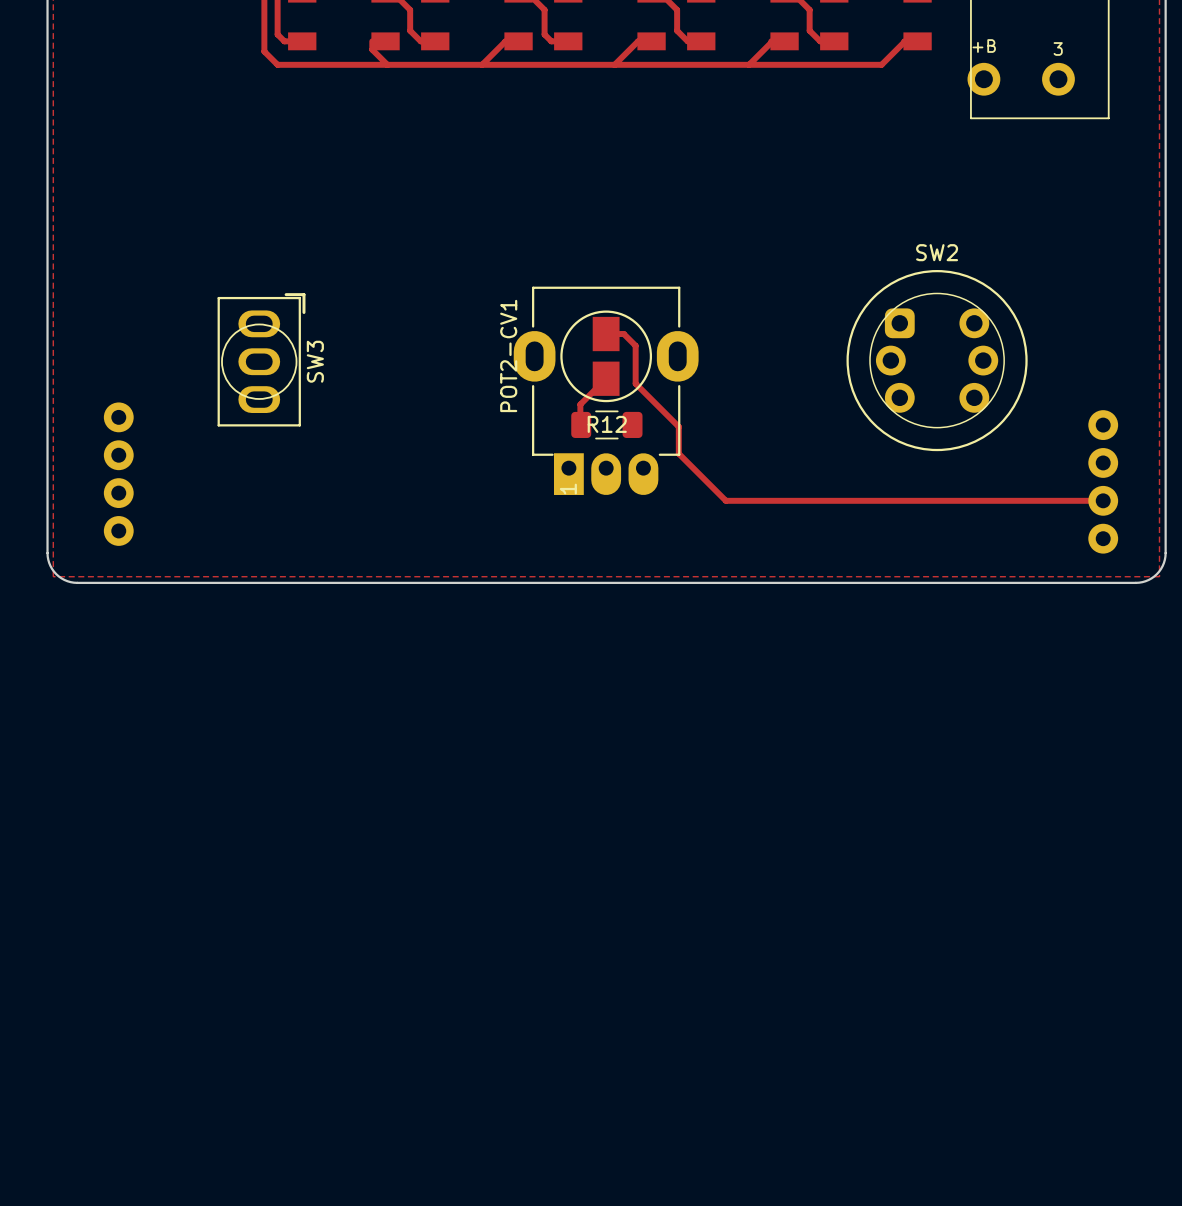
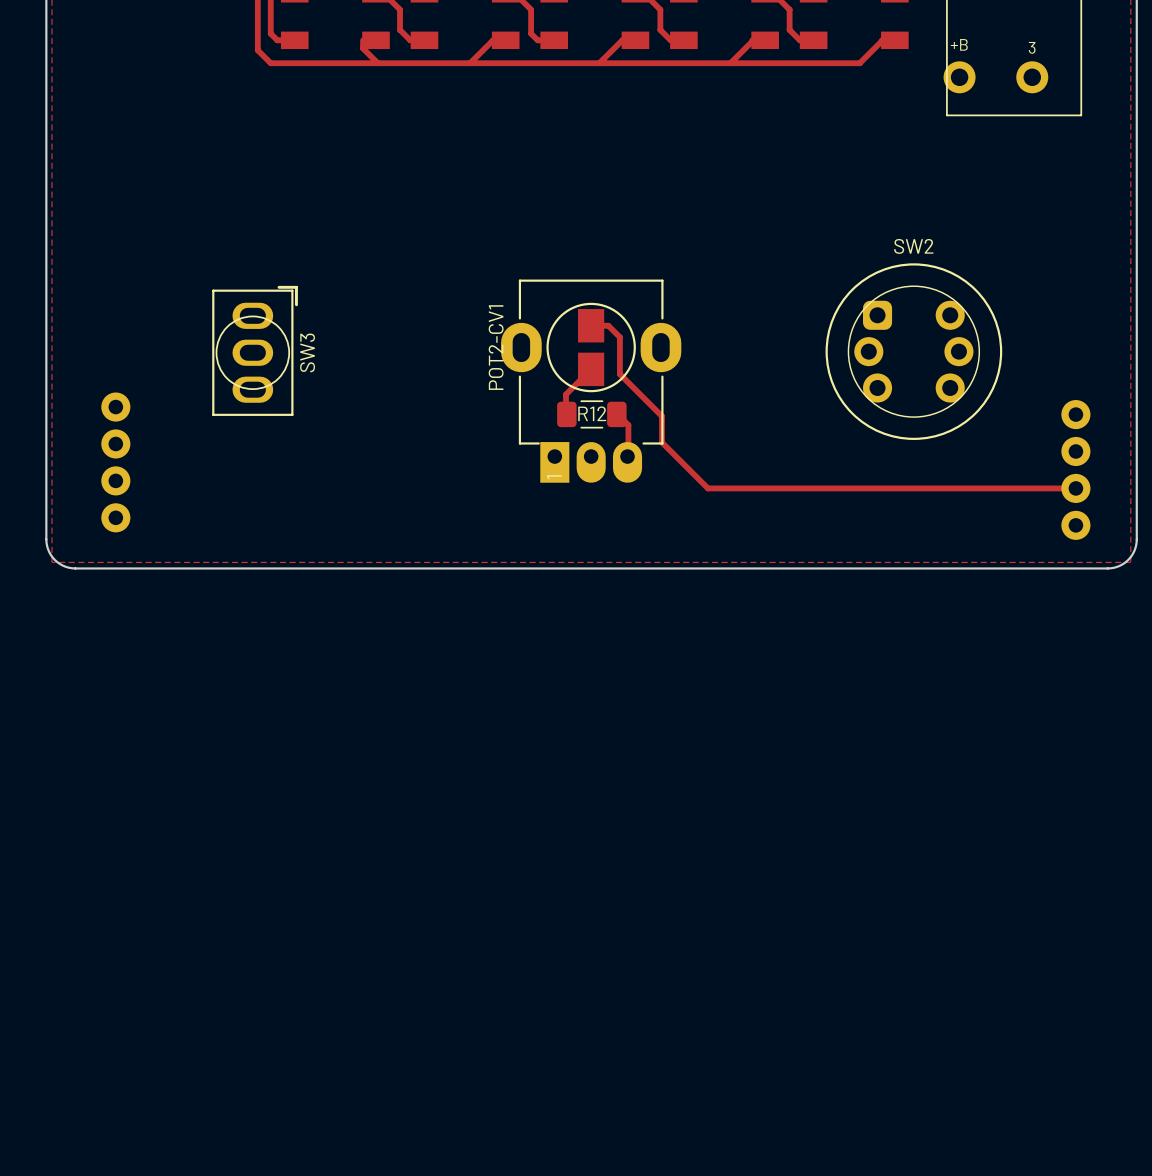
track: none -> (617, 414) (628, 425) (628, 455)

